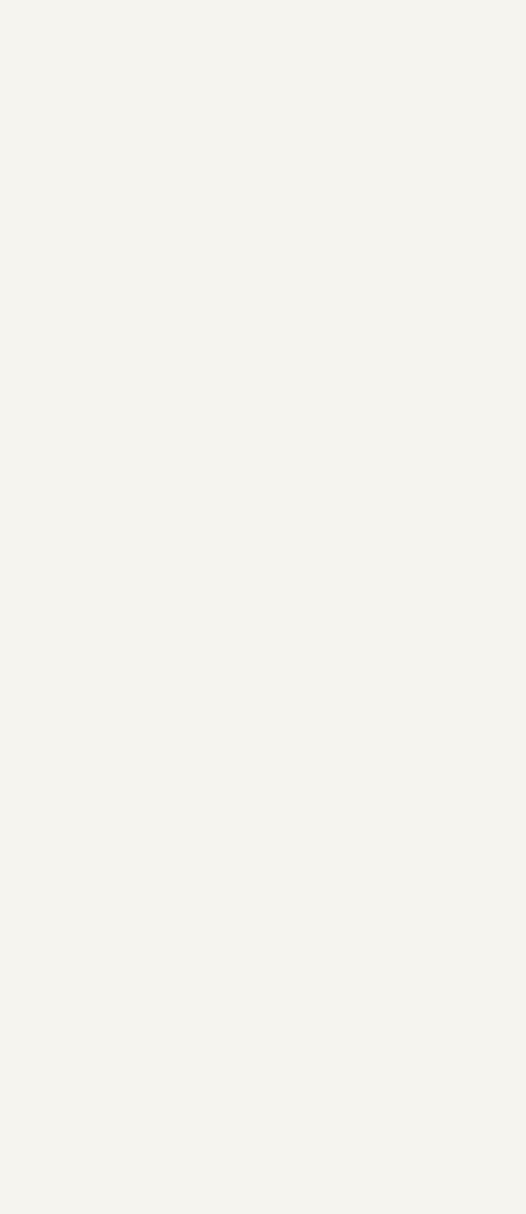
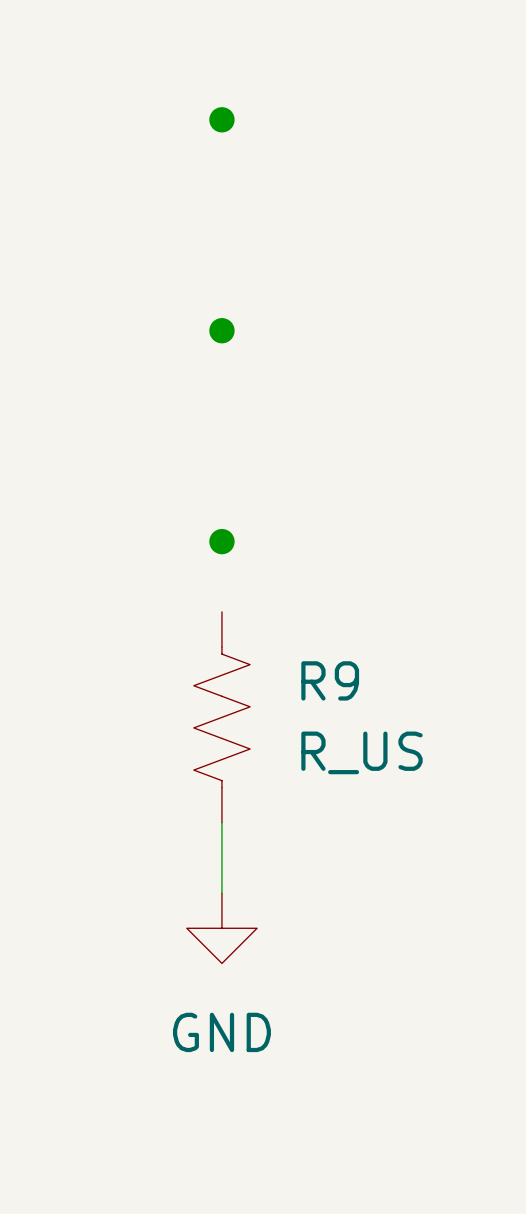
junction: none -> (221, 119)
junction: none -> (221, 330)
junction: none -> (221, 541)
R9: none -> R_US (221, 717)
wire: none -> (221, 822) (221, 893)
power symbol: none -> GND (221, 928)

